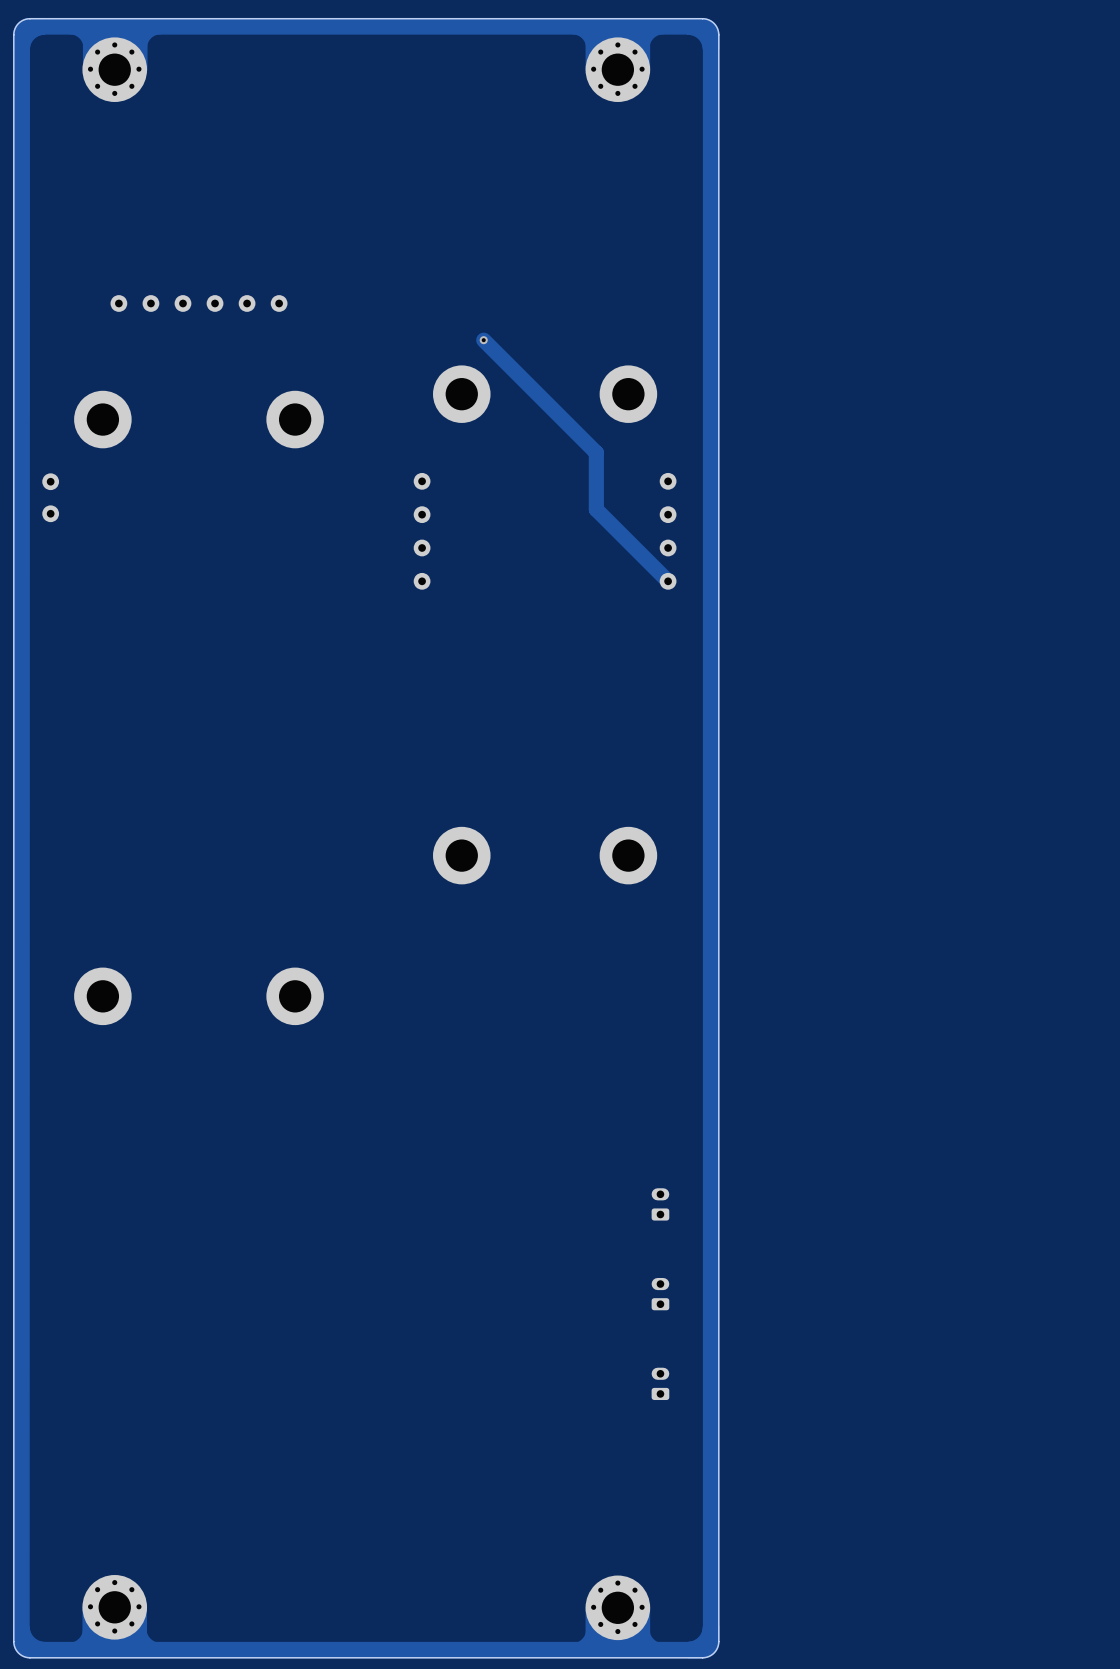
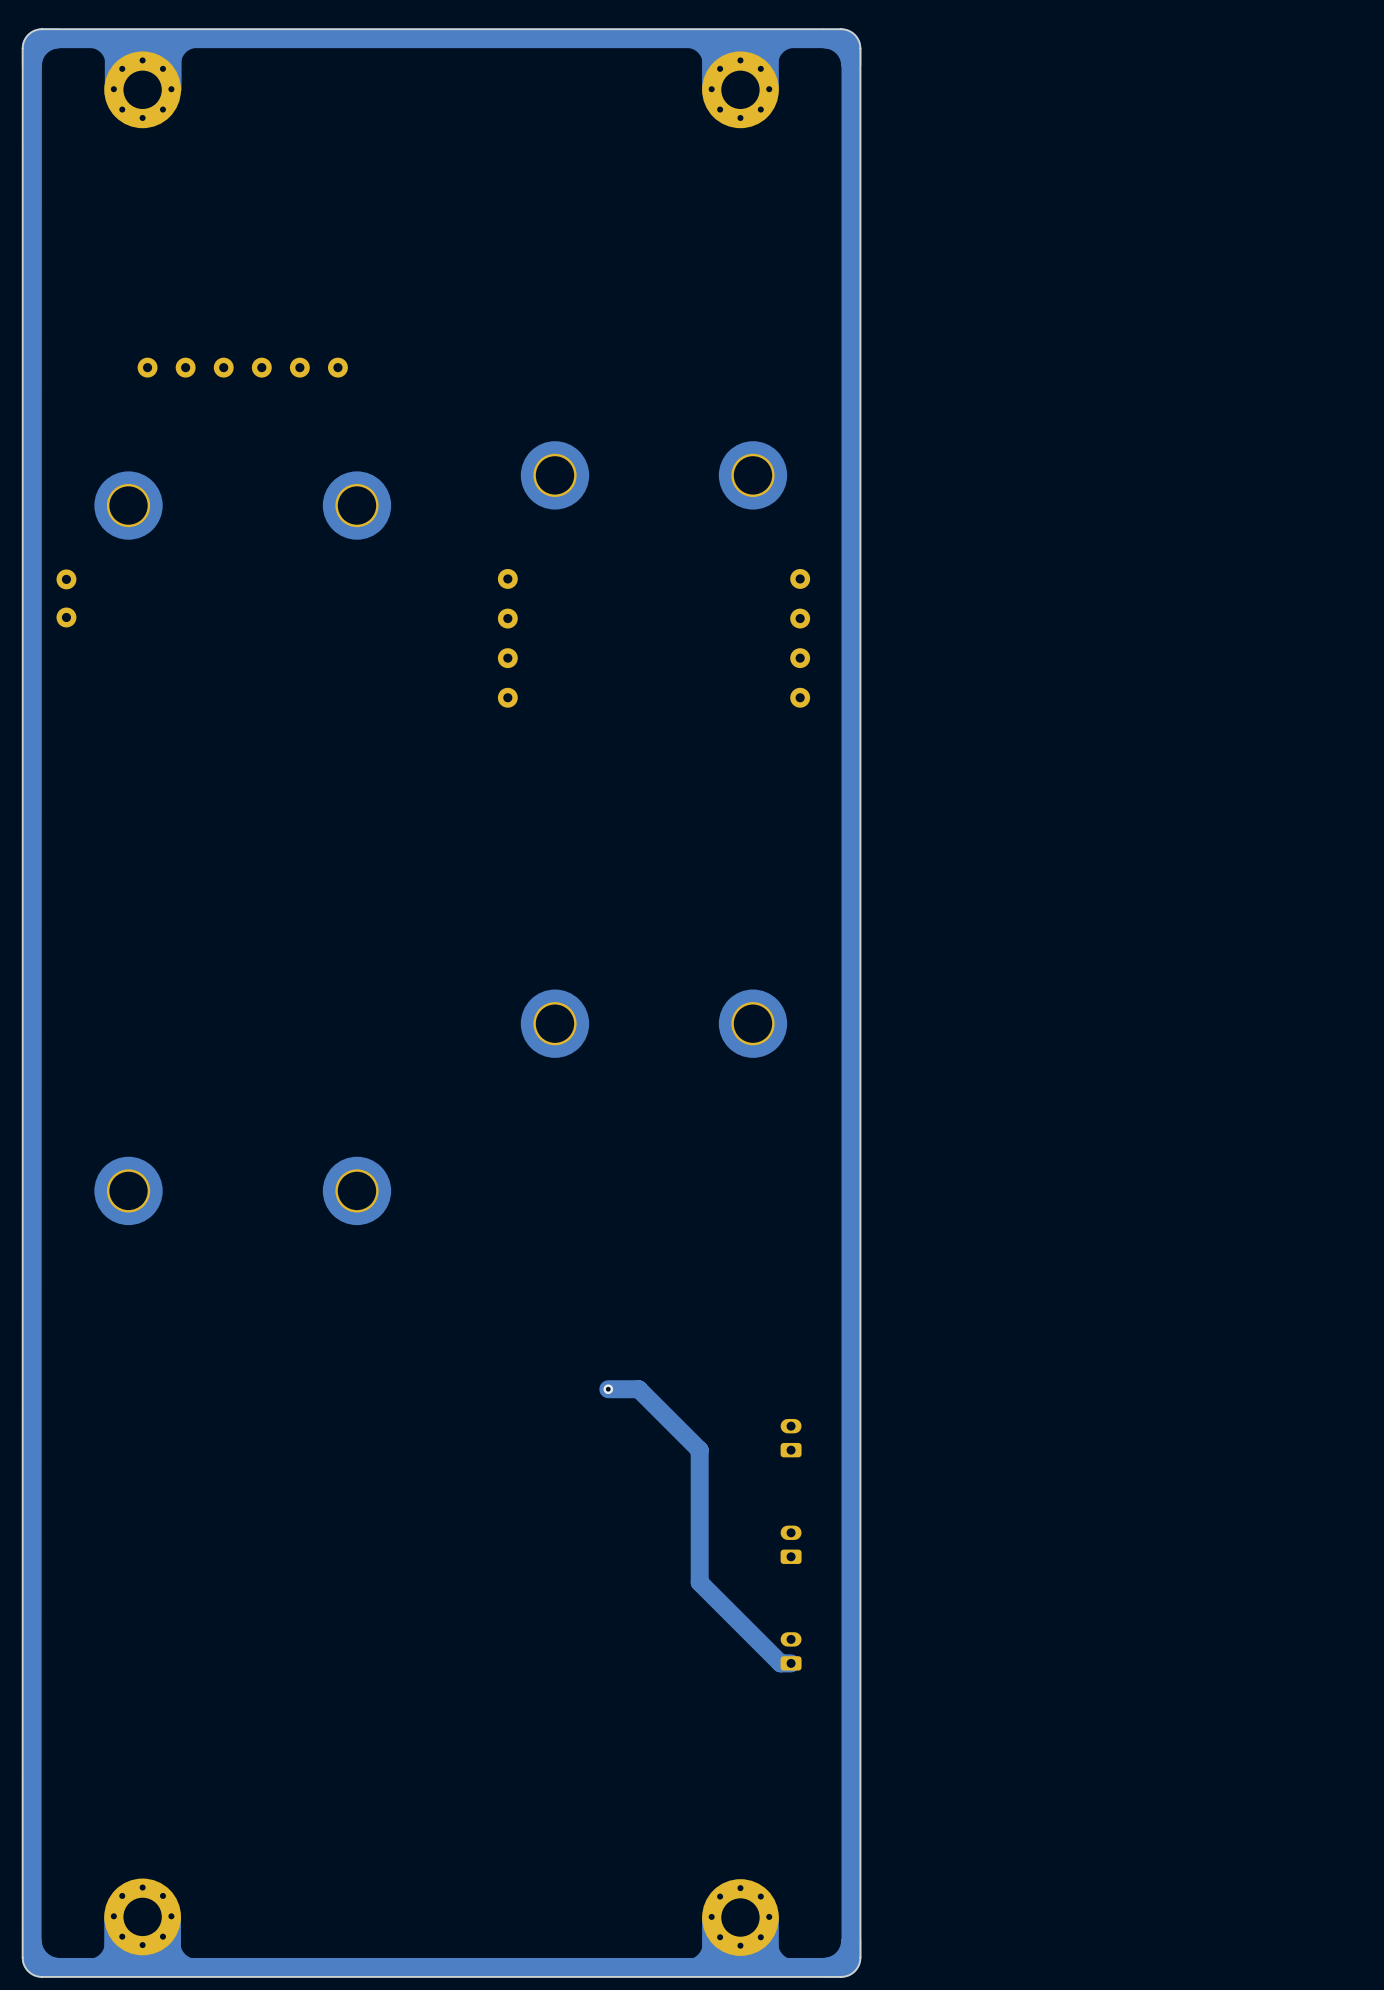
track: (483, 340) (596, 452) (596, 509) (668, 581) -> none
via: (483, 340) -> none
track: none -> (608, 1389) (638, 1389) (699, 1450) (699, 1582) (780, 1663) (791, 1663)
via: none -> (608, 1389)

